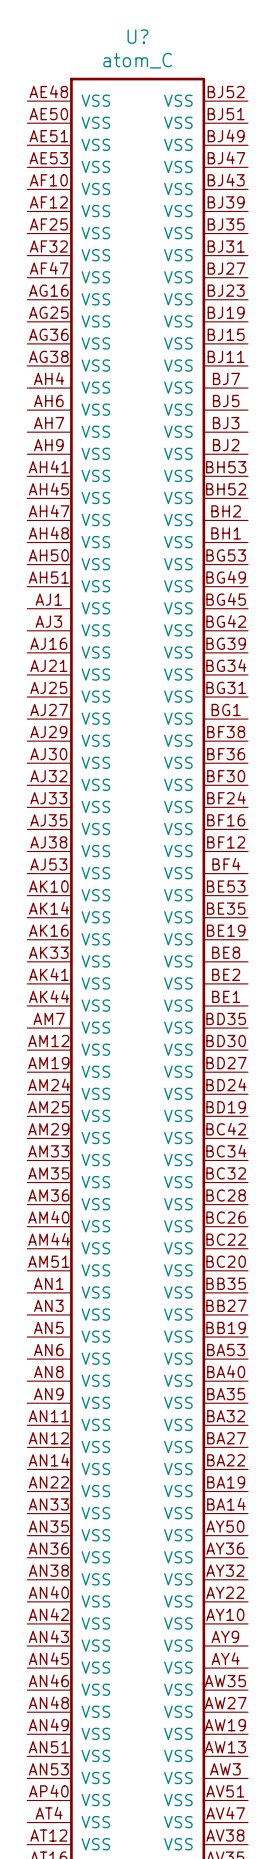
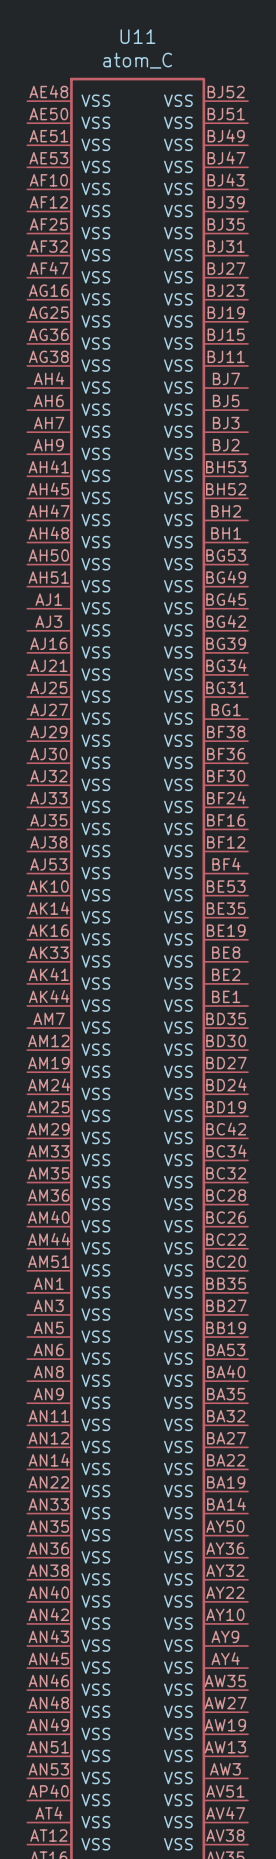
U? name: U? (137, 36) -> U11 (137, 36)

